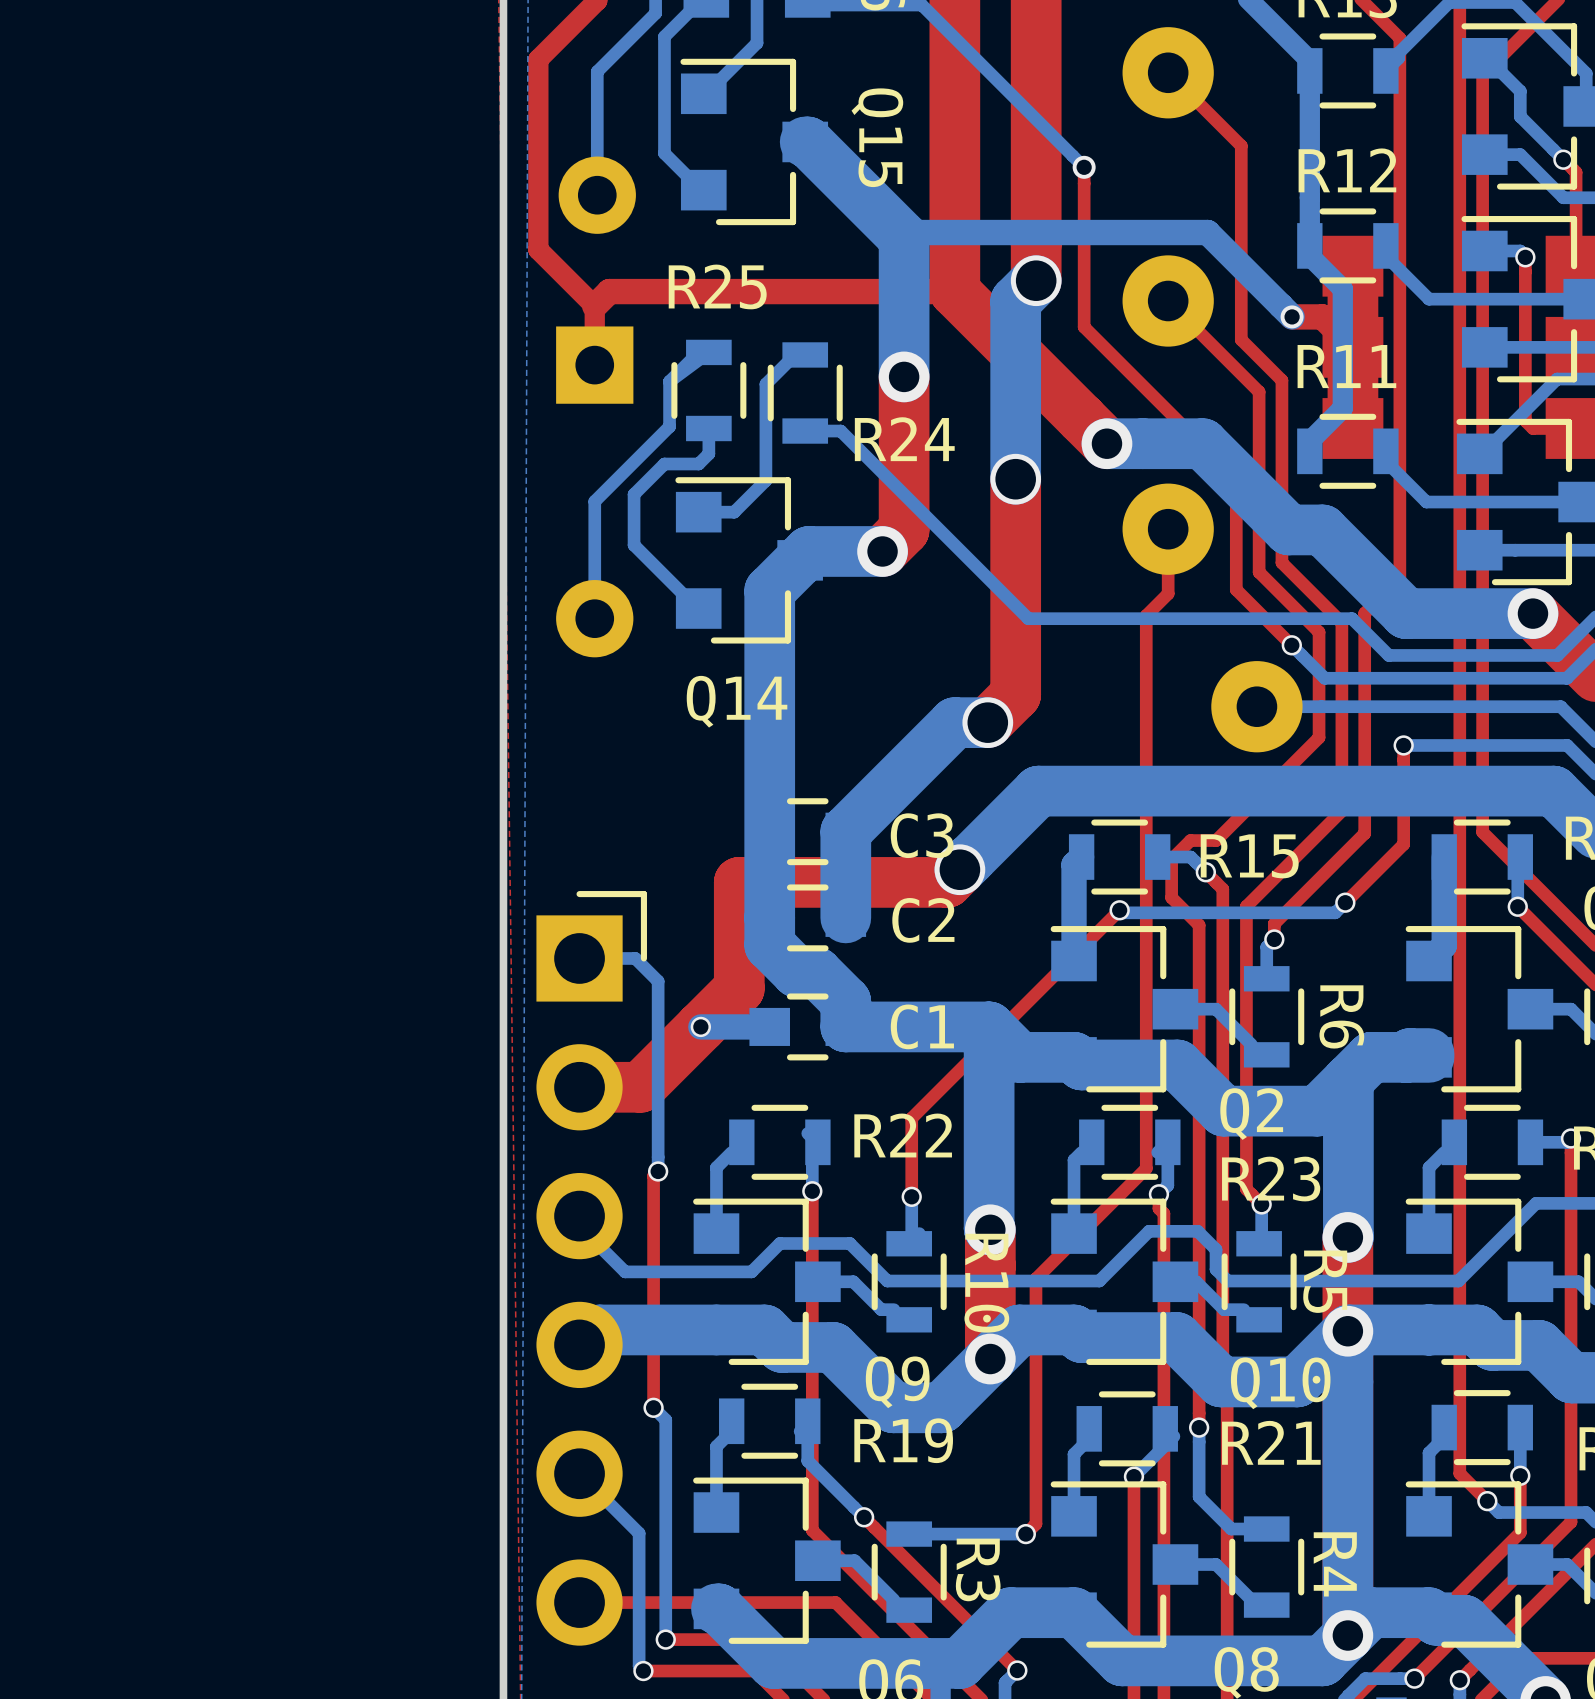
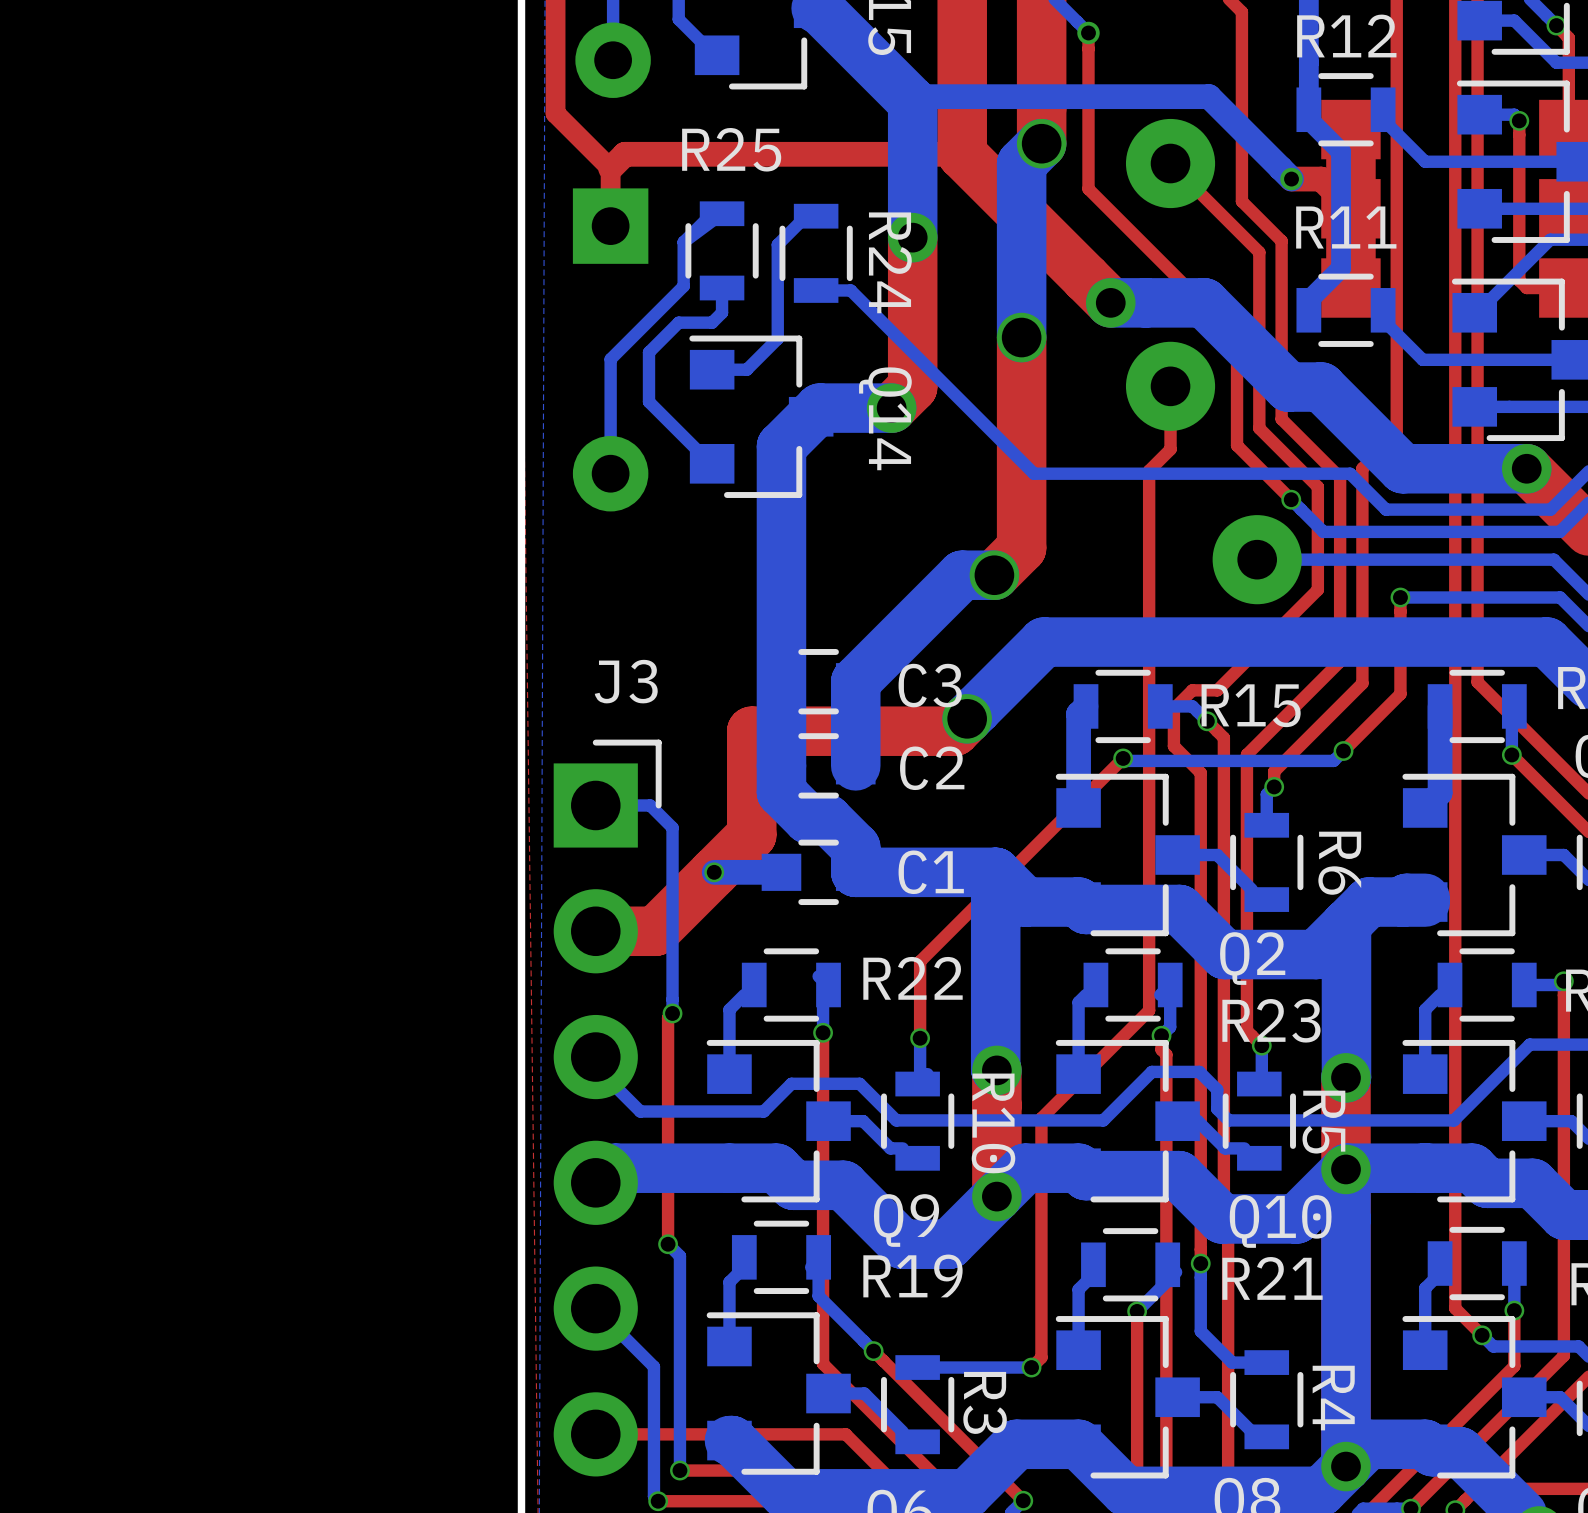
R24 name rotation: 0° (904, 439) -> 90° clockwise (890, 262)
Q14 name rotation: 0° (737, 701) -> 90° clockwise (885, 418)
Q14 name position: Q14 (737, 701) -> Q14 (885, 418)
J3 name: none -> J3 (626, 681)

